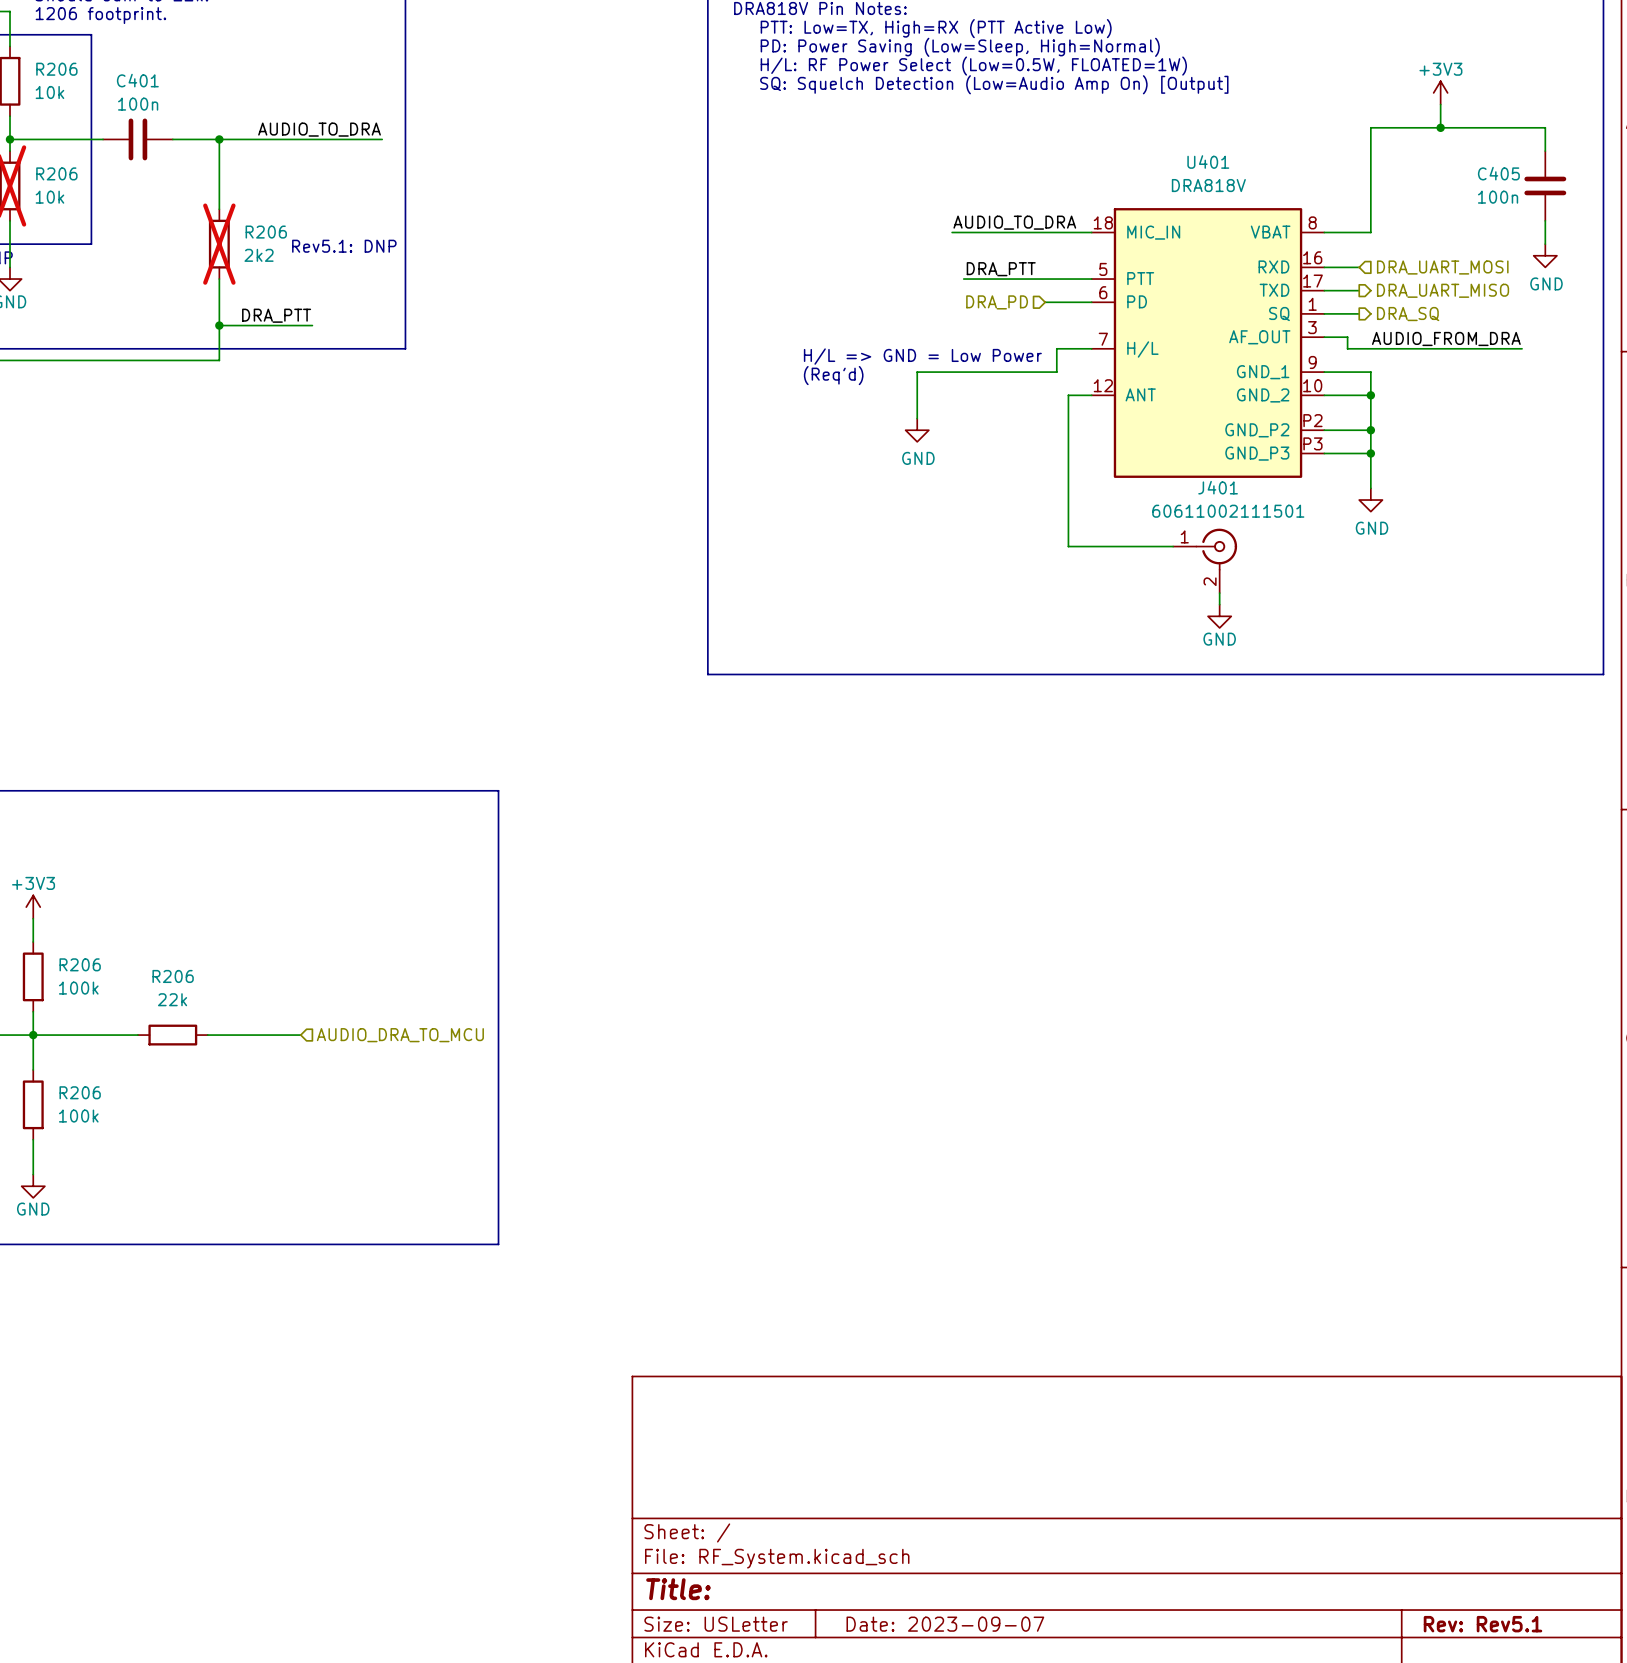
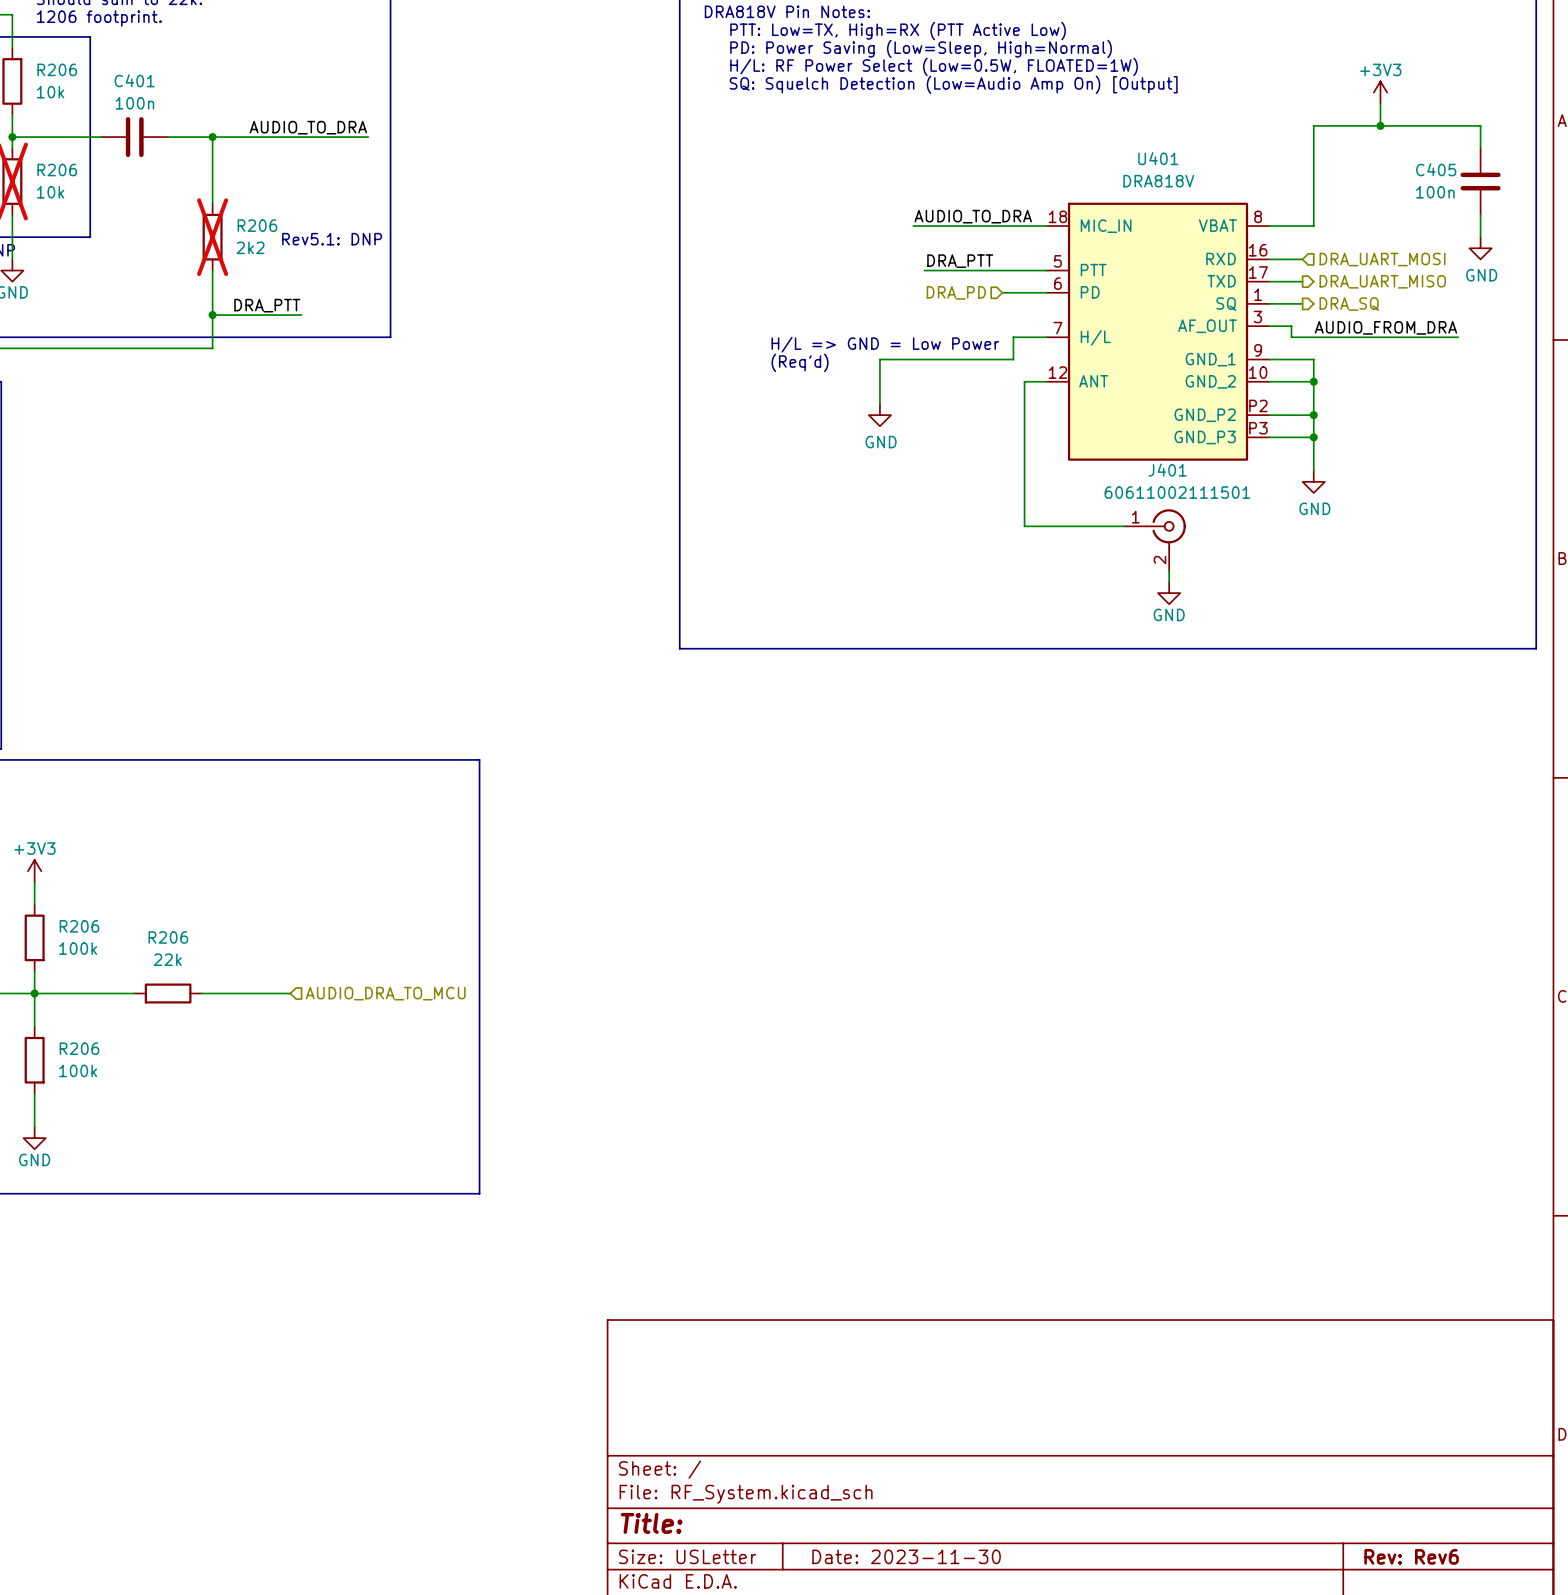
title block: Date: 2023-09-07 (945, 1624) -> Date: 2023-11-30 (906, 1556)
title block: Rev: Rev5.1 (1483, 1624) -> Rev: Rev6 (1411, 1556)

